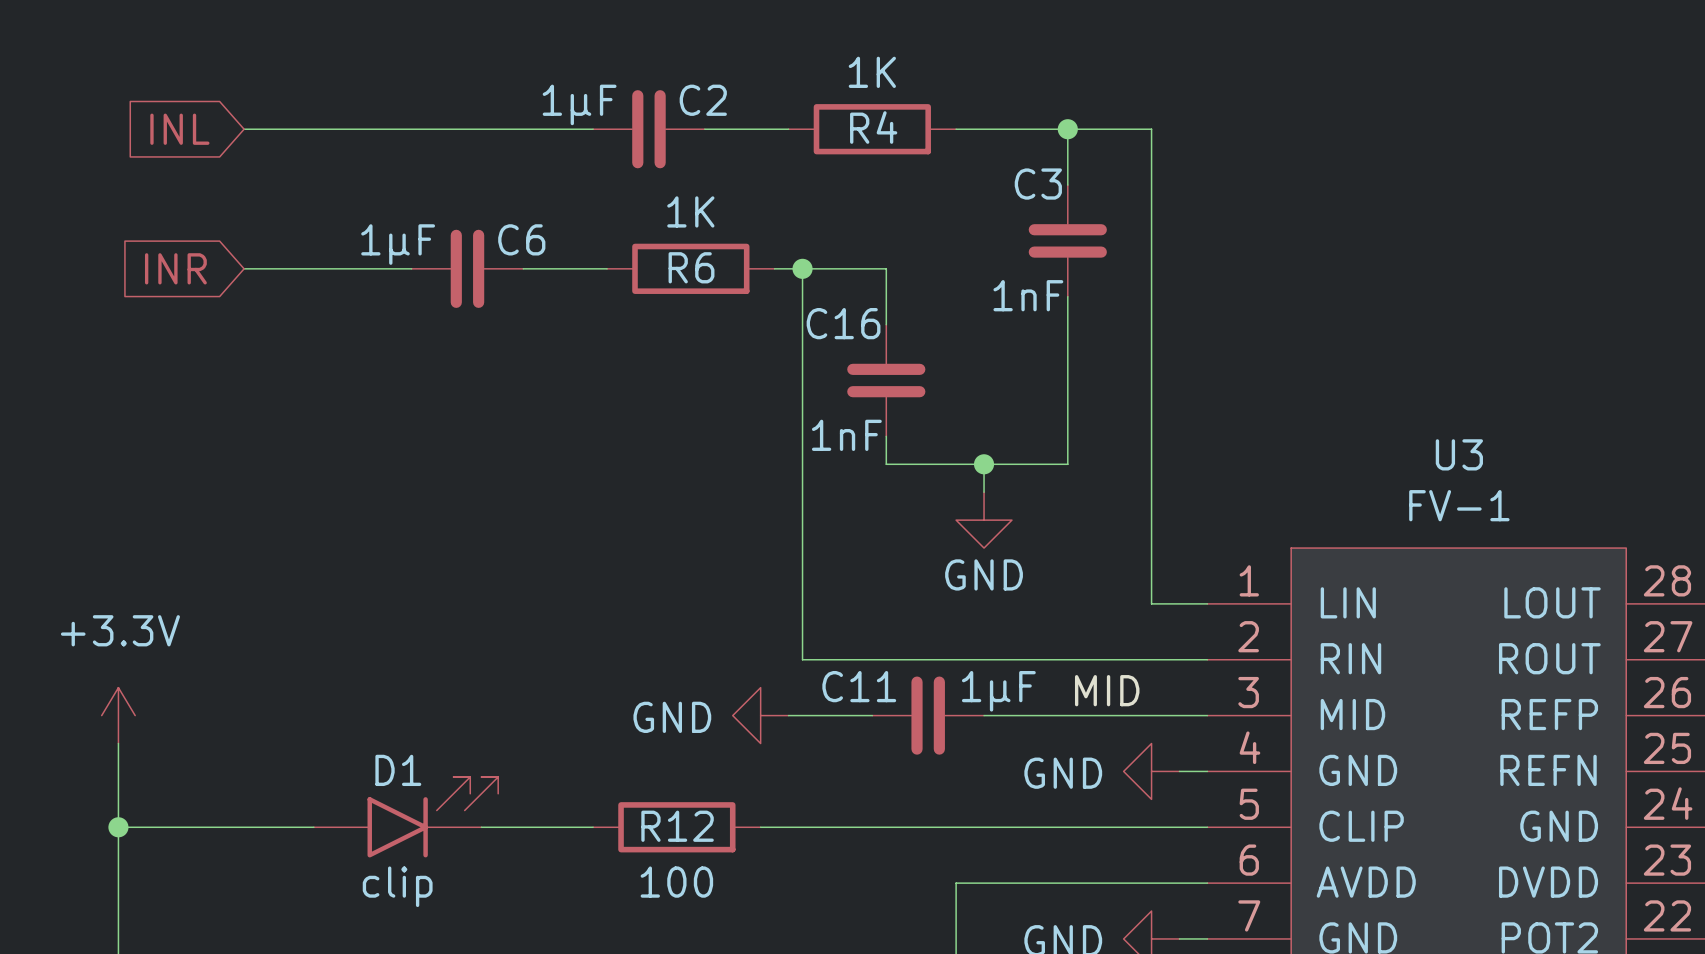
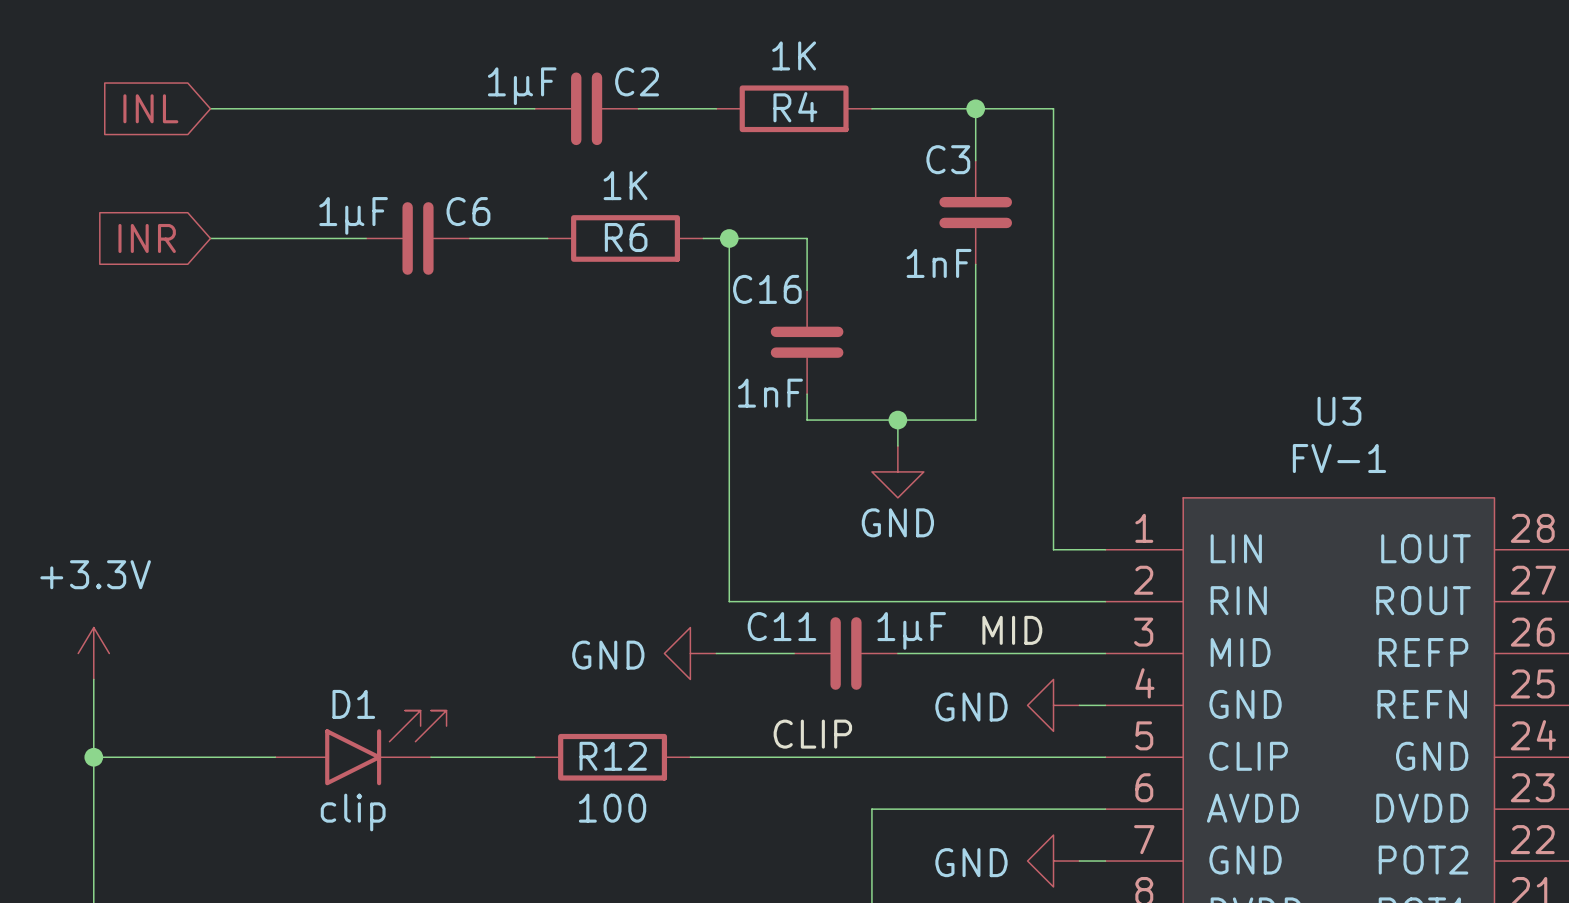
label: none -> CLIP (812, 734)

